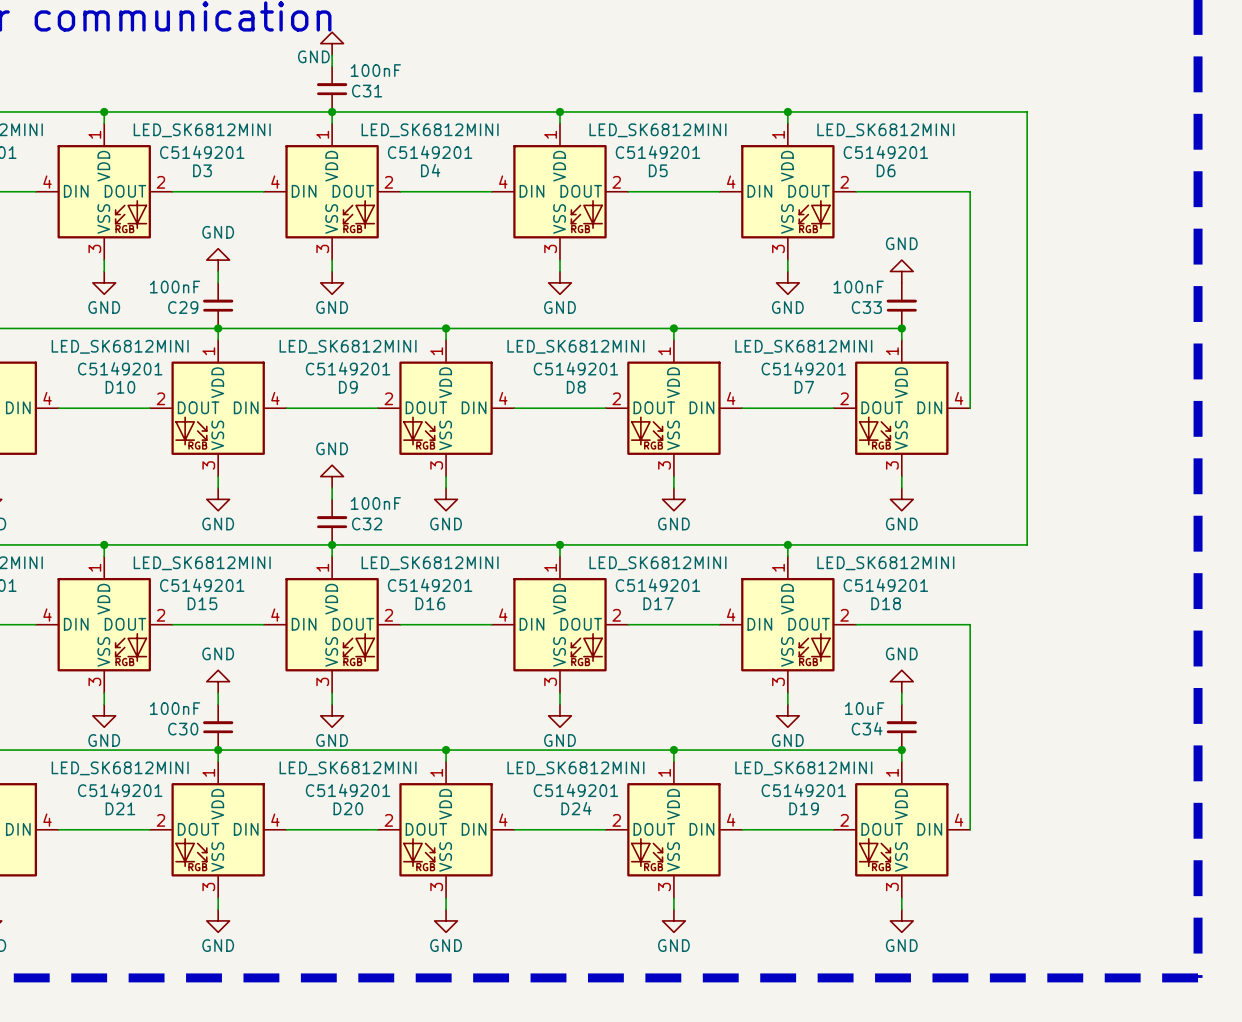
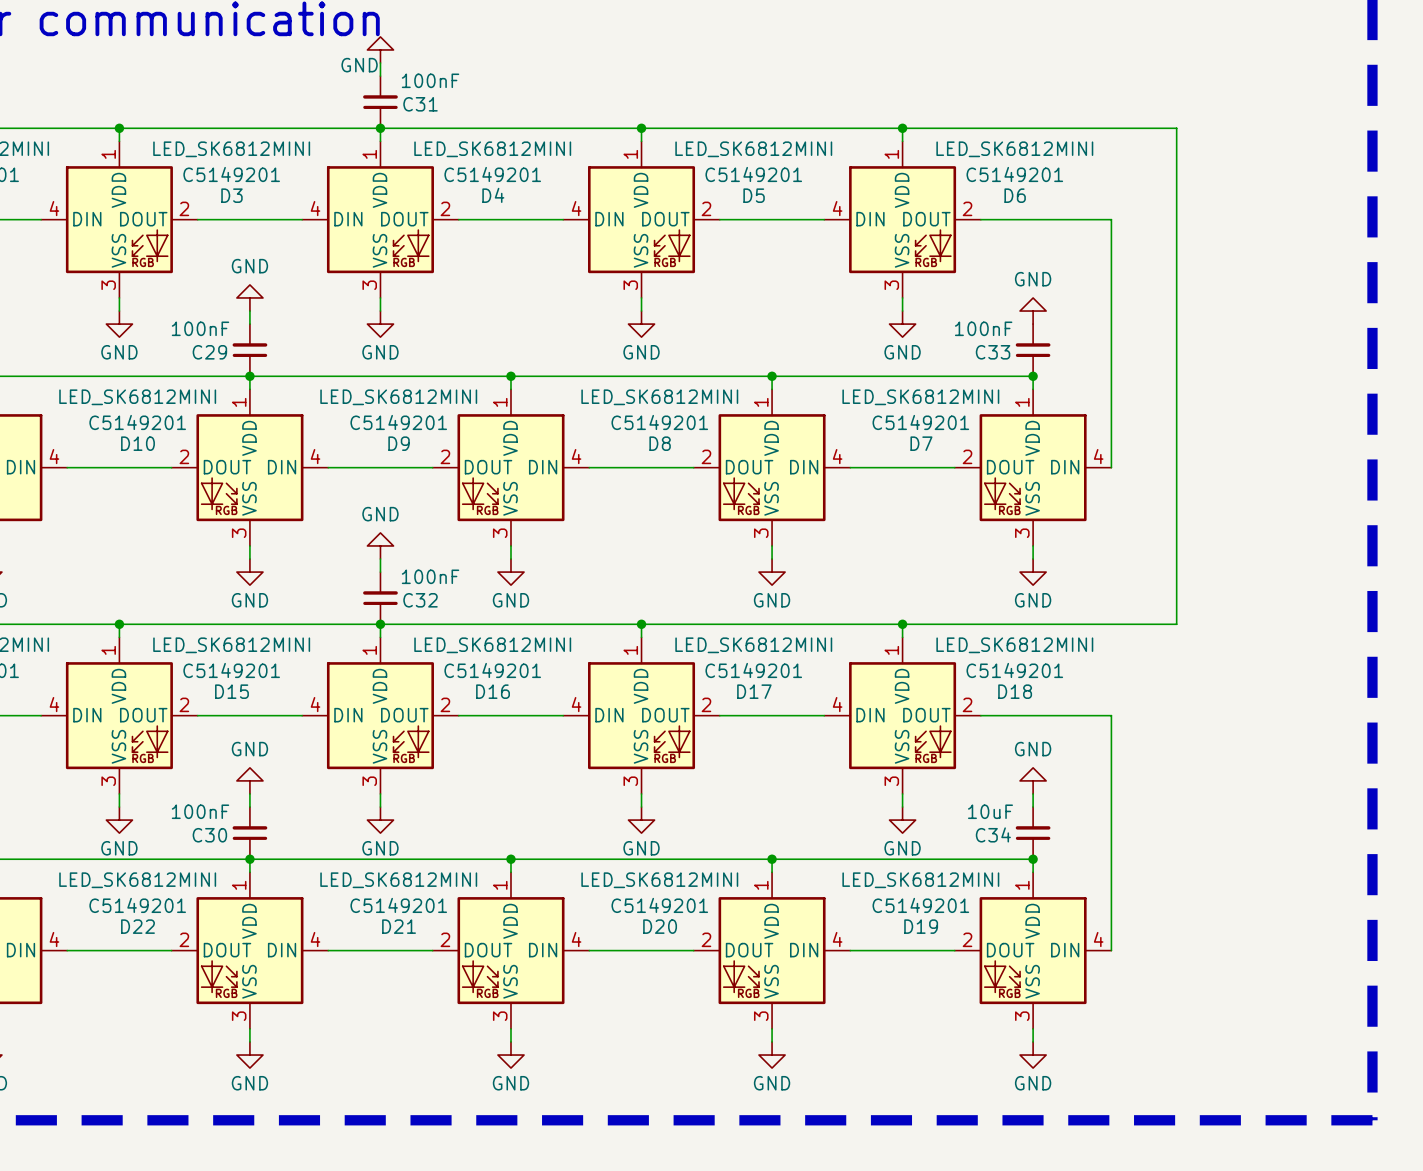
D21 name: D21 (120, 808) -> D22 (138, 926)
D20 name: D20 (348, 808) -> D21 (399, 926)
D24 name: D24 (576, 808) -> D20 (660, 926)

